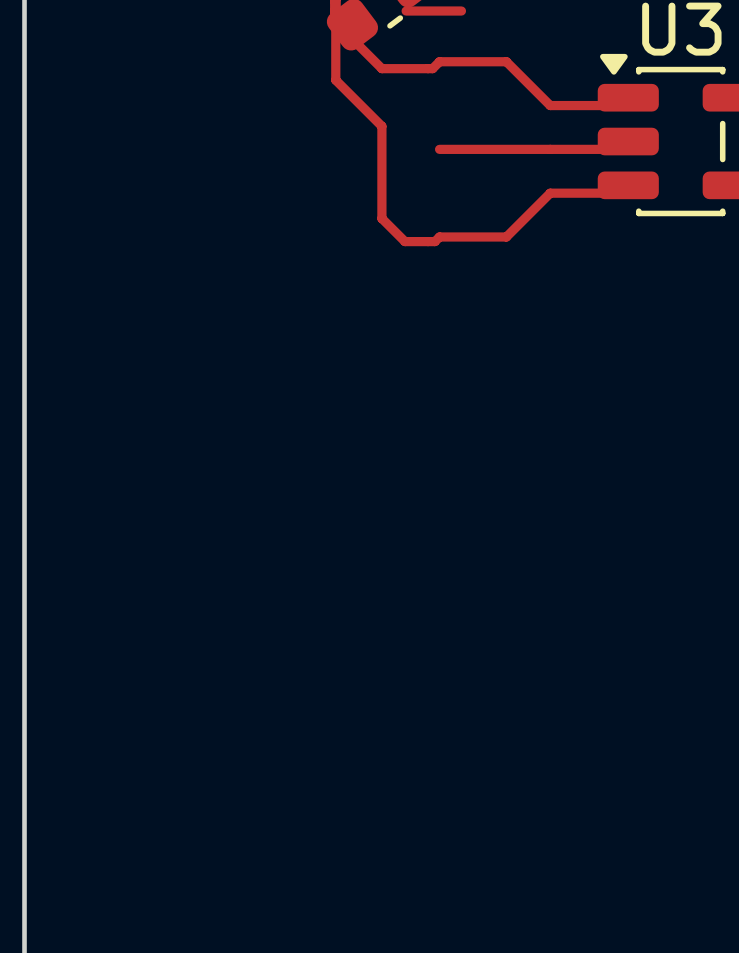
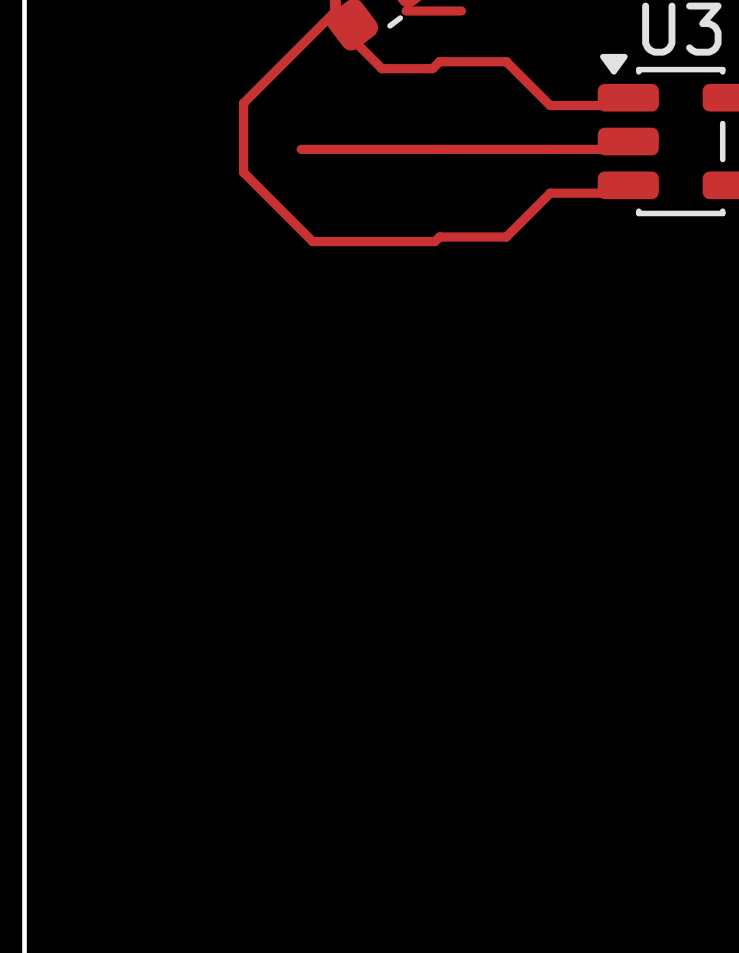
track: (334, 12) (335, 80) (381, 126) (381, 218) (404, 241) -> (334, 12) (243, 103) (243, 172) (312, 241) (404, 241)
track: none -> (301, 149) (439, 149)

